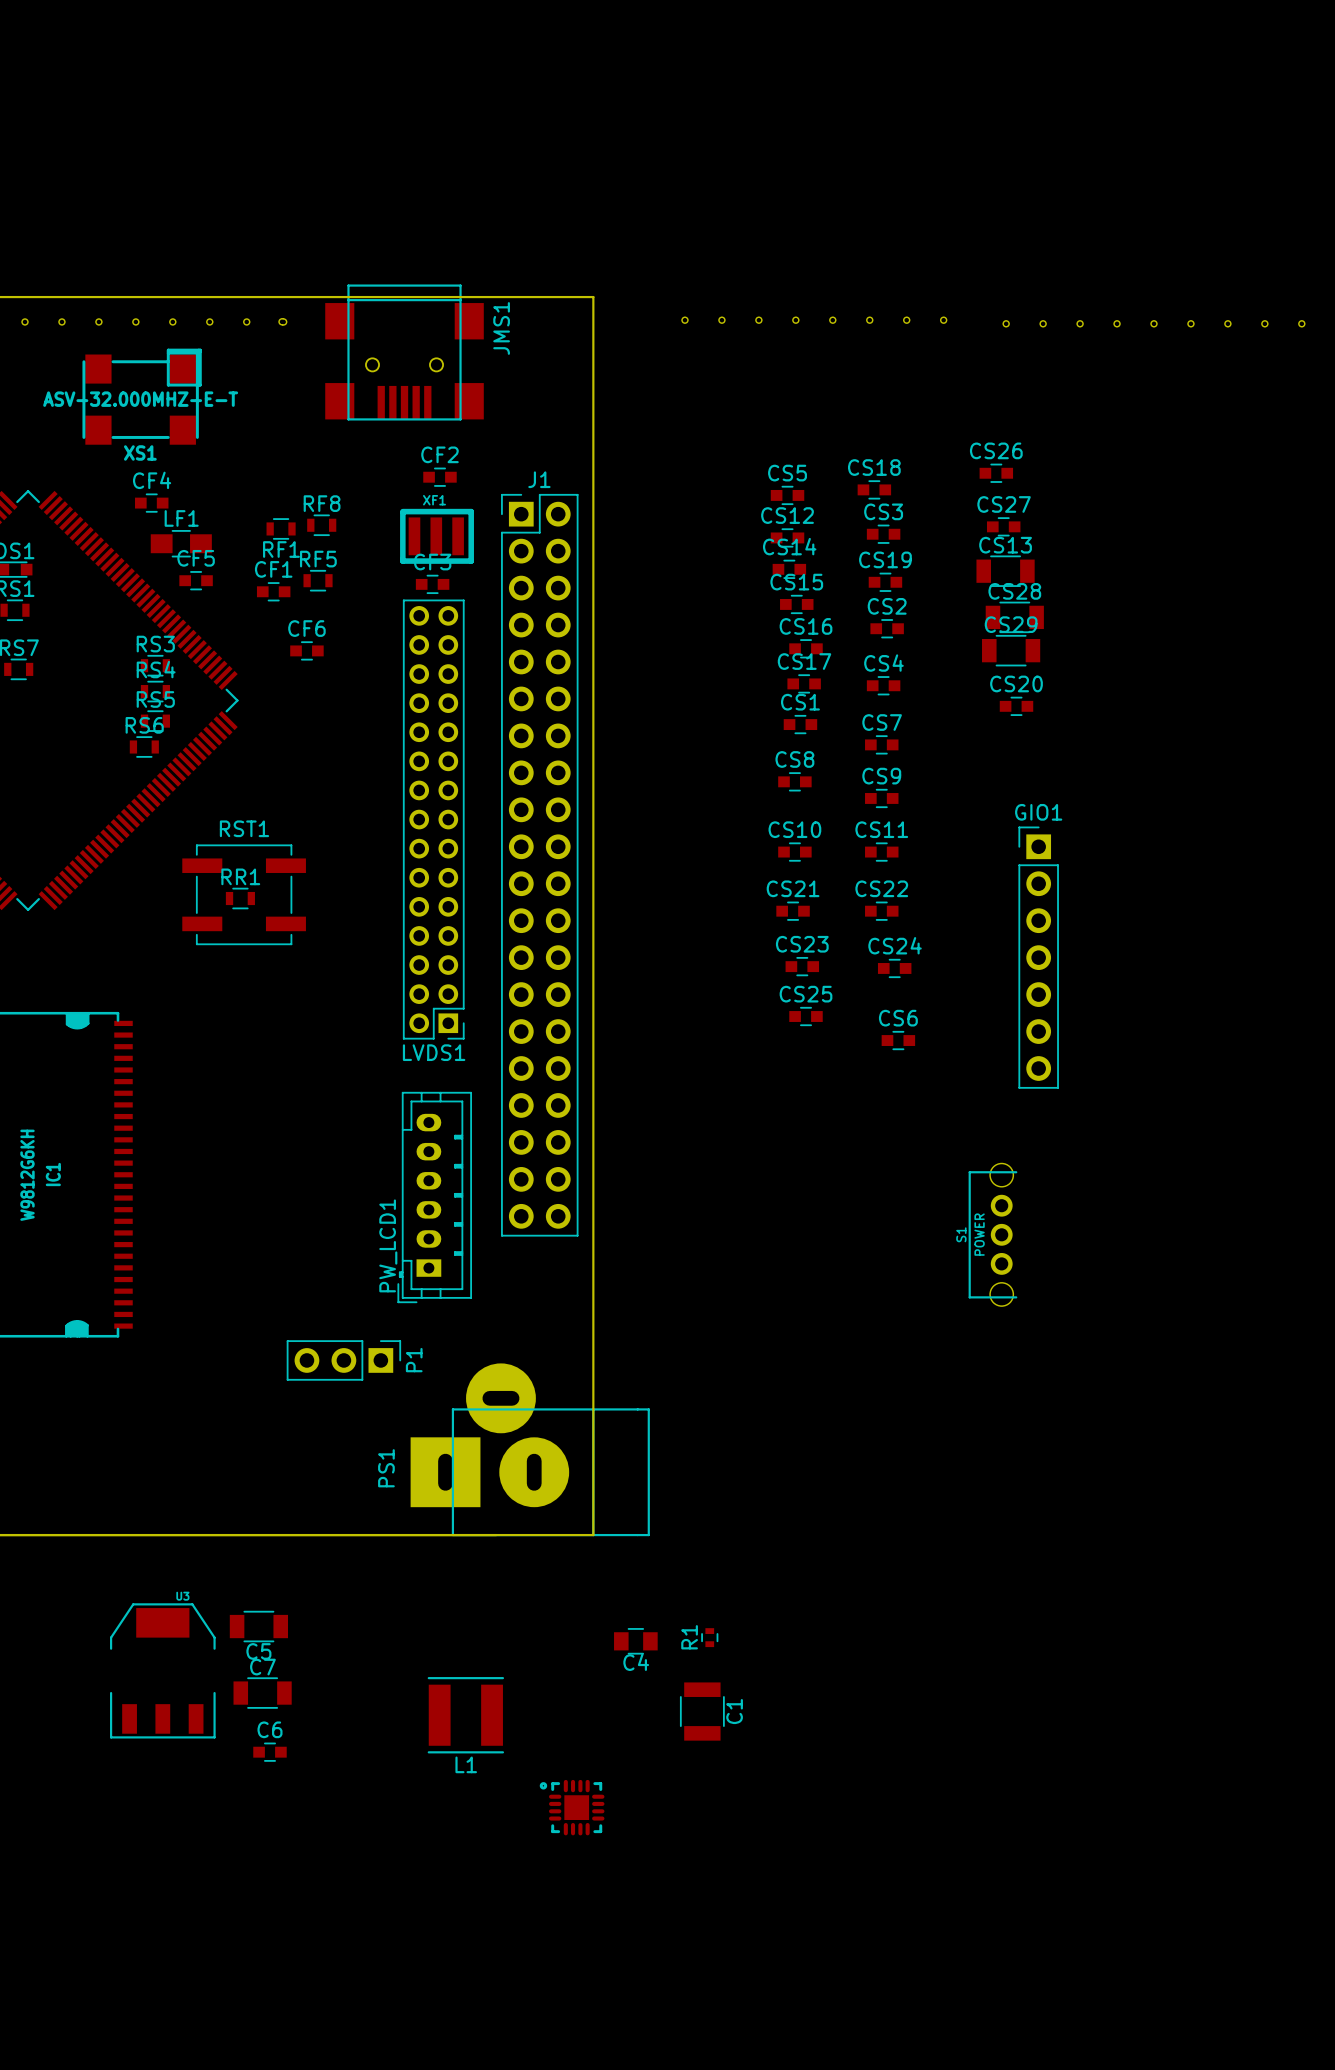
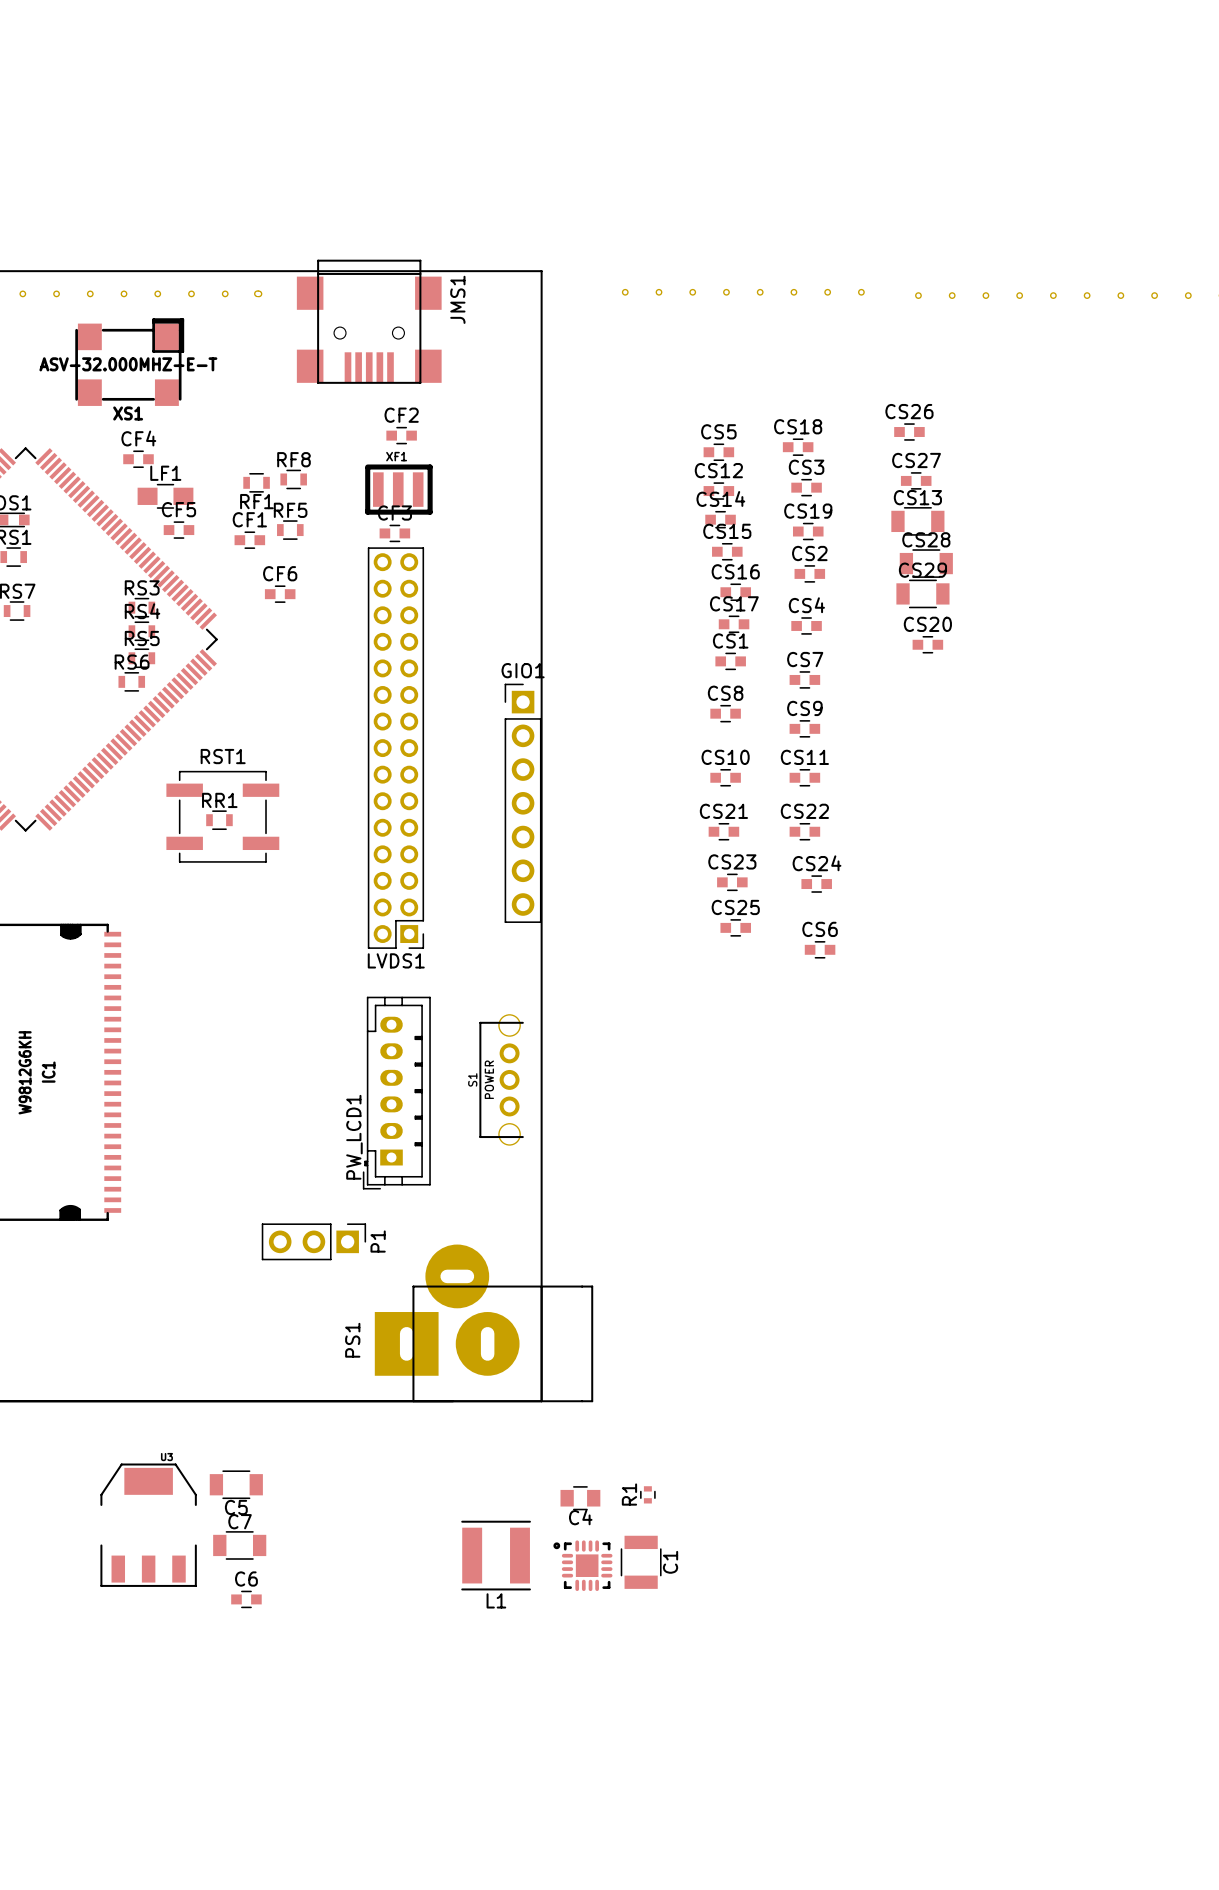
J1: (539, 865) -> none
GIO1 position: (1038, 957) -> (523, 803)
S1 position: (992, 1234) -> (501, 1079)
L1 position: (465, 1715) -> (496, 1555)
part position: (572, 1807) -> (582, 1565)

